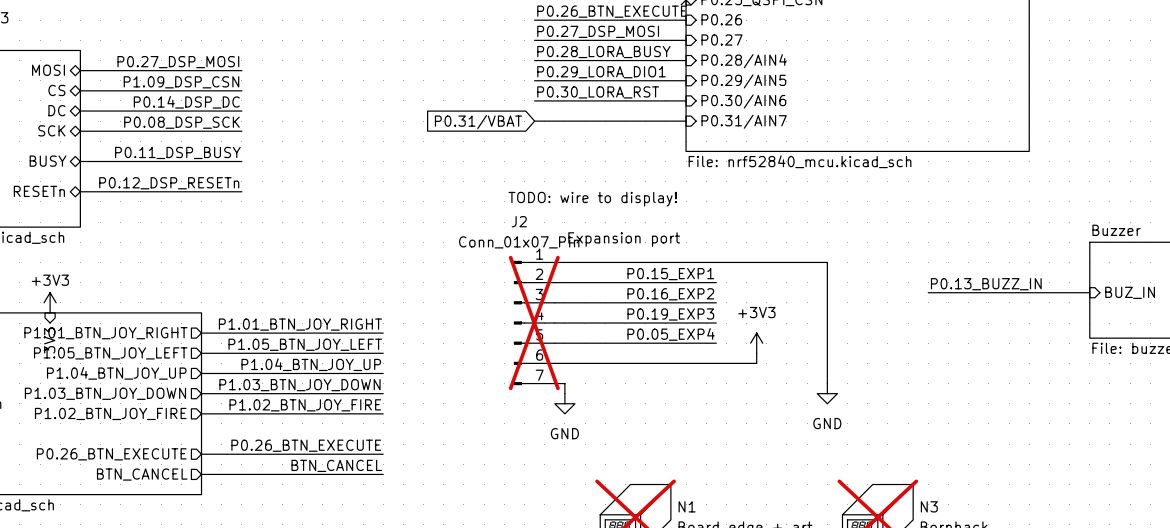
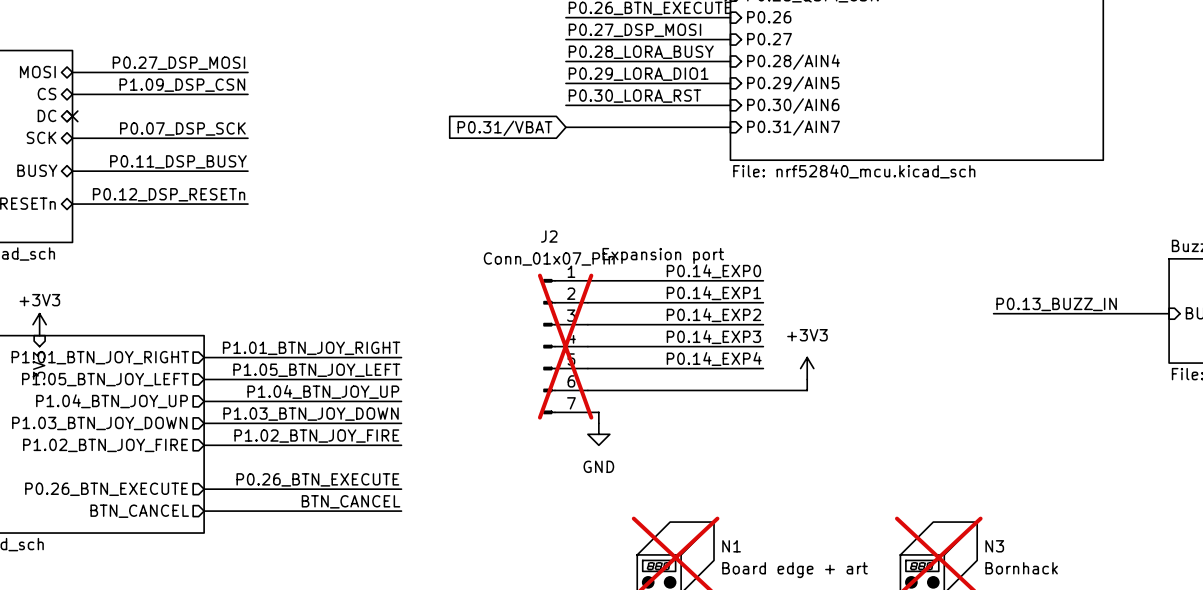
label: P0.14_DSP_DC (186, 102) -> none
wire: (80, 111) (241, 111) -> none
no-connect mark: none -> (72, 116)
label: P0.08_DSP_SCK (181, 122) -> P0.07_DSP_SCK (182, 128)
text: TODO: wire to display! (592, 199) -> none
label: none -> P0.14_EXP0 (713, 271)
wire: (716, 262) (827, 262) (827, 383) -> none
label: P0.15_EXP1 (670, 274) -> P0.14_EXP1 (713, 293)
label: P0.16_EXP2 (670, 294) -> P0.14_EXP2 (713, 315)
label: P0.19_EXP3 (670, 314) -> P0.14_EXP3 (713, 337)
label: P0.05_EXP4 (671, 334) -> P0.14_EXP4 (714, 359)
power symbol: GND (827, 393) -> none

